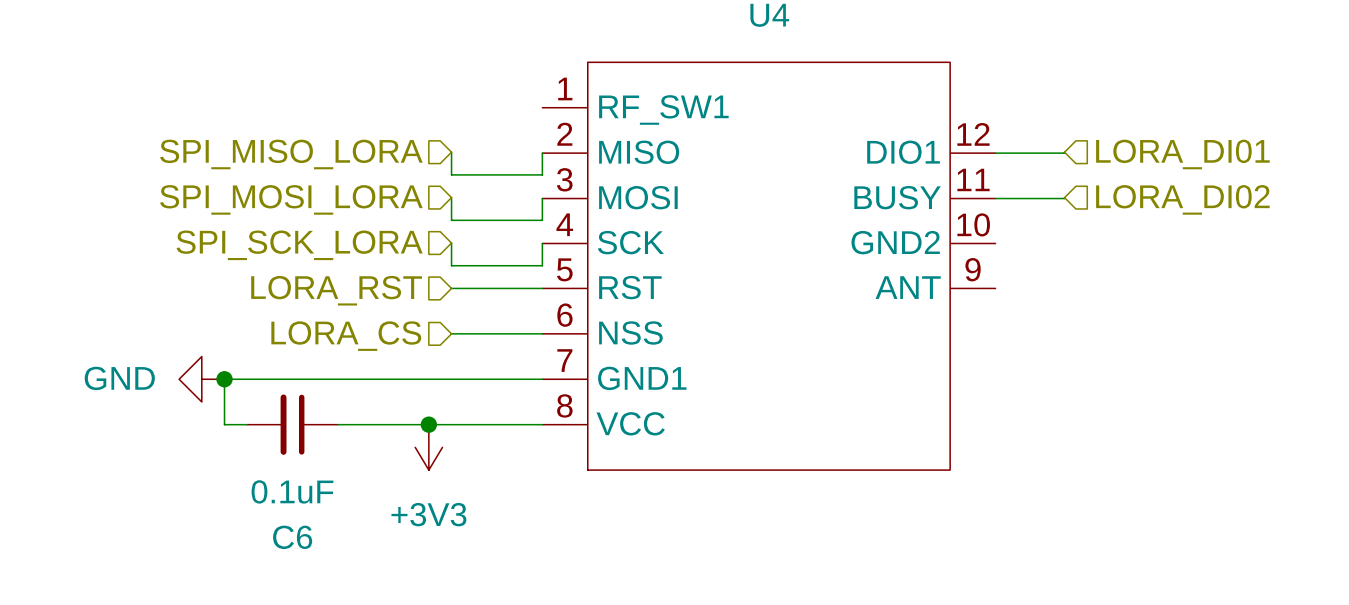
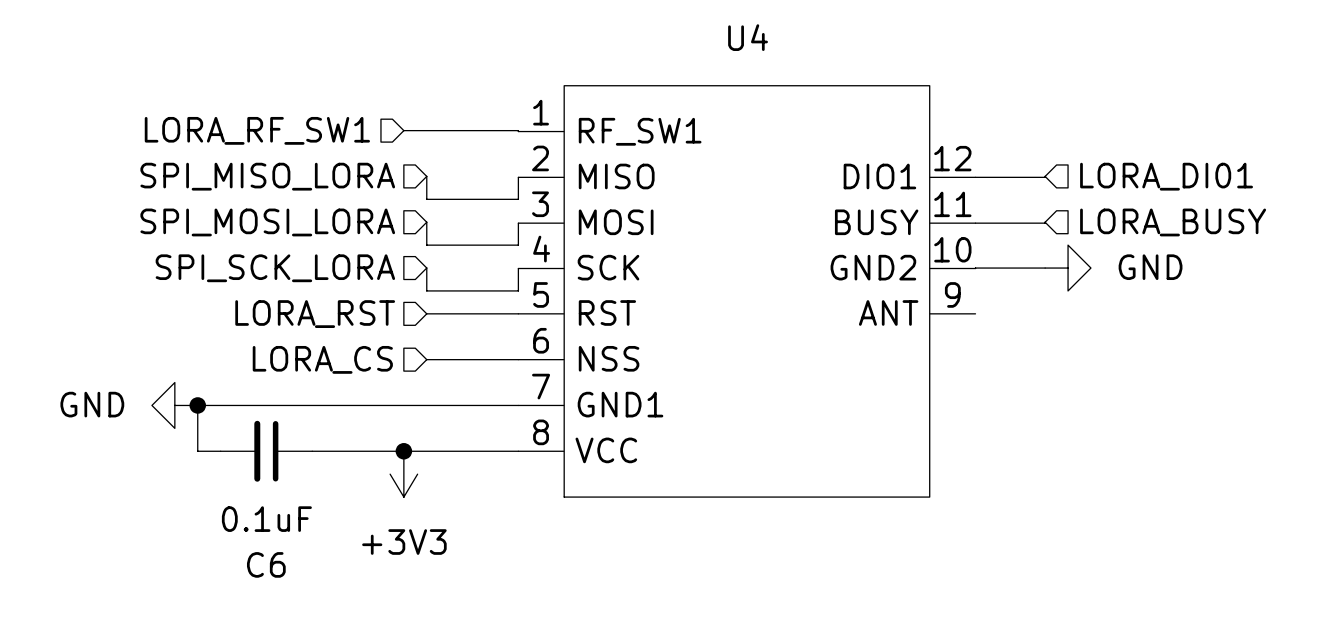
wire: none -> (403, 130) (518, 131)
hierarchical label: none -> LORA_RF_SW1 (257, 130)
hierarchical label: LORA_DI02 (1182, 199) -> LORA_BUSY (1173, 222)
wire: none -> (1045, 268) (975, 268)
power symbol: none -> GND (1068, 268)

